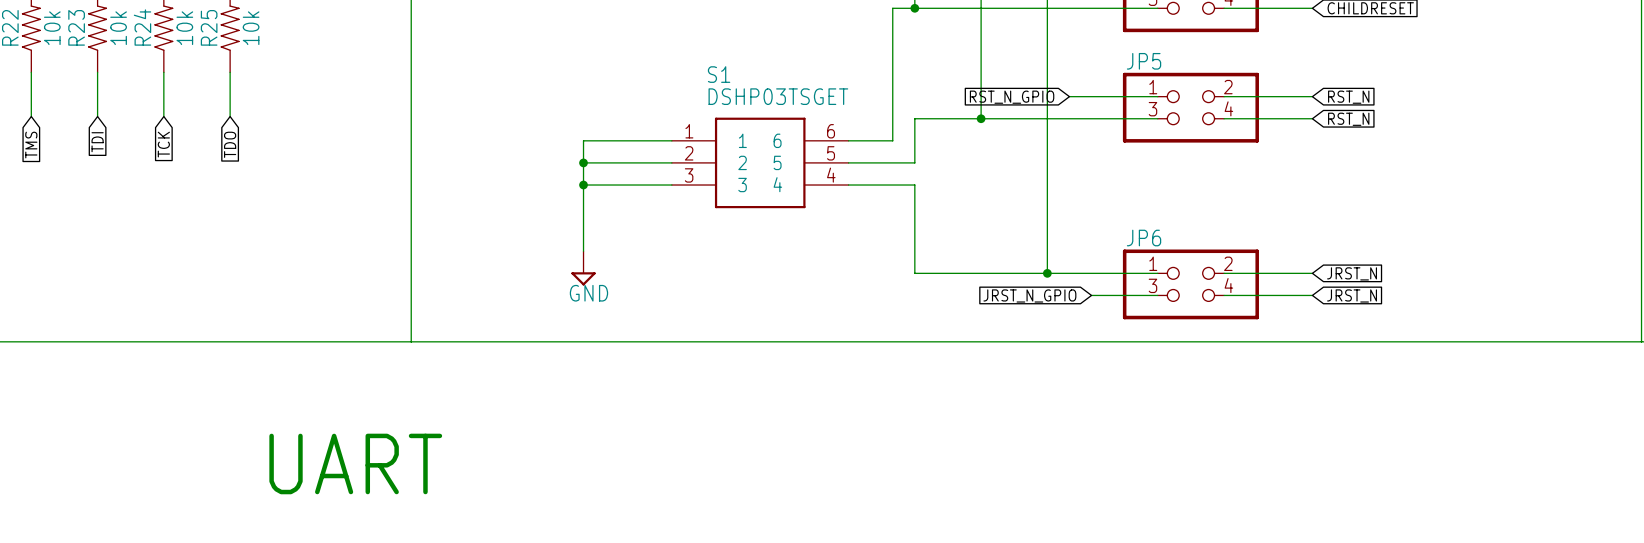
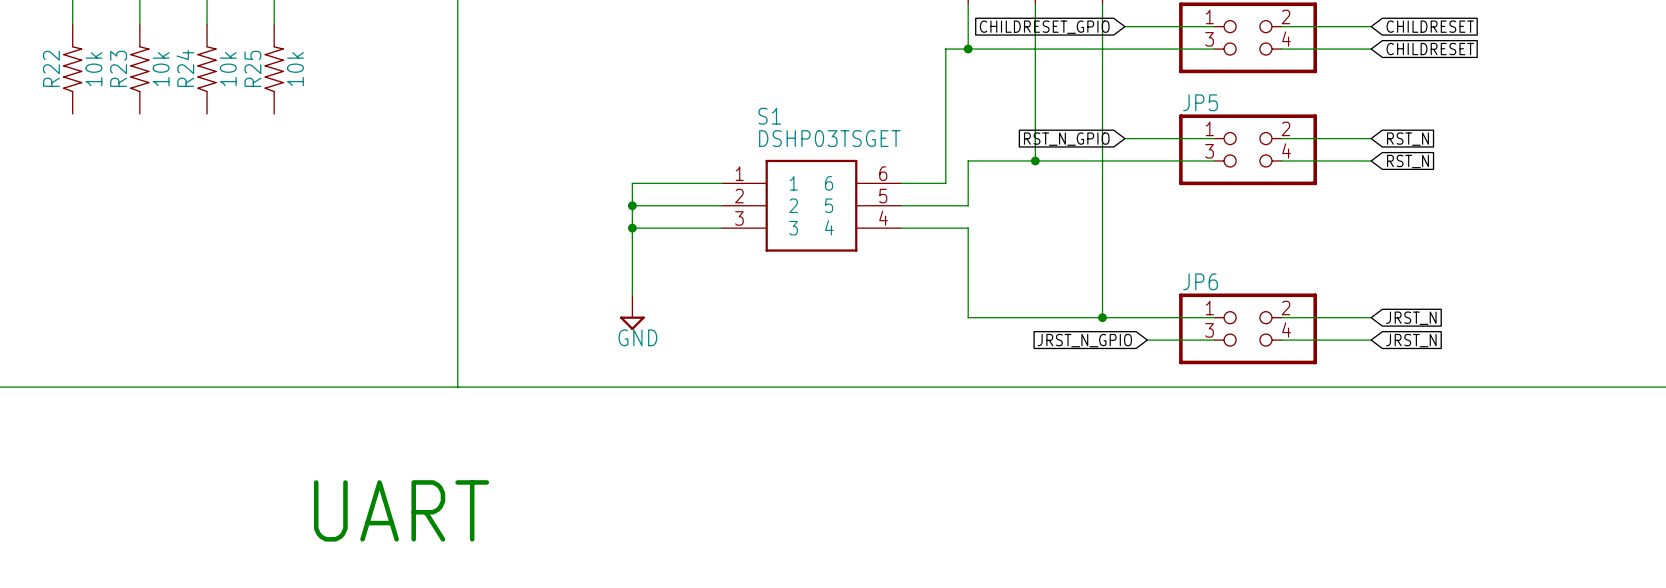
wire: (31, 72) (31, 116) -> none
wire: (97, 72) (97, 116) -> none
wire: (163, 72) (163, 116) -> none
wire: (230, 72) (230, 116) -> none
global label: TDI (97, 142) -> none
global label: TCK (163, 144) -> none
global label: TDO (230, 144) -> none
global label: TMS (31, 145) -> none

